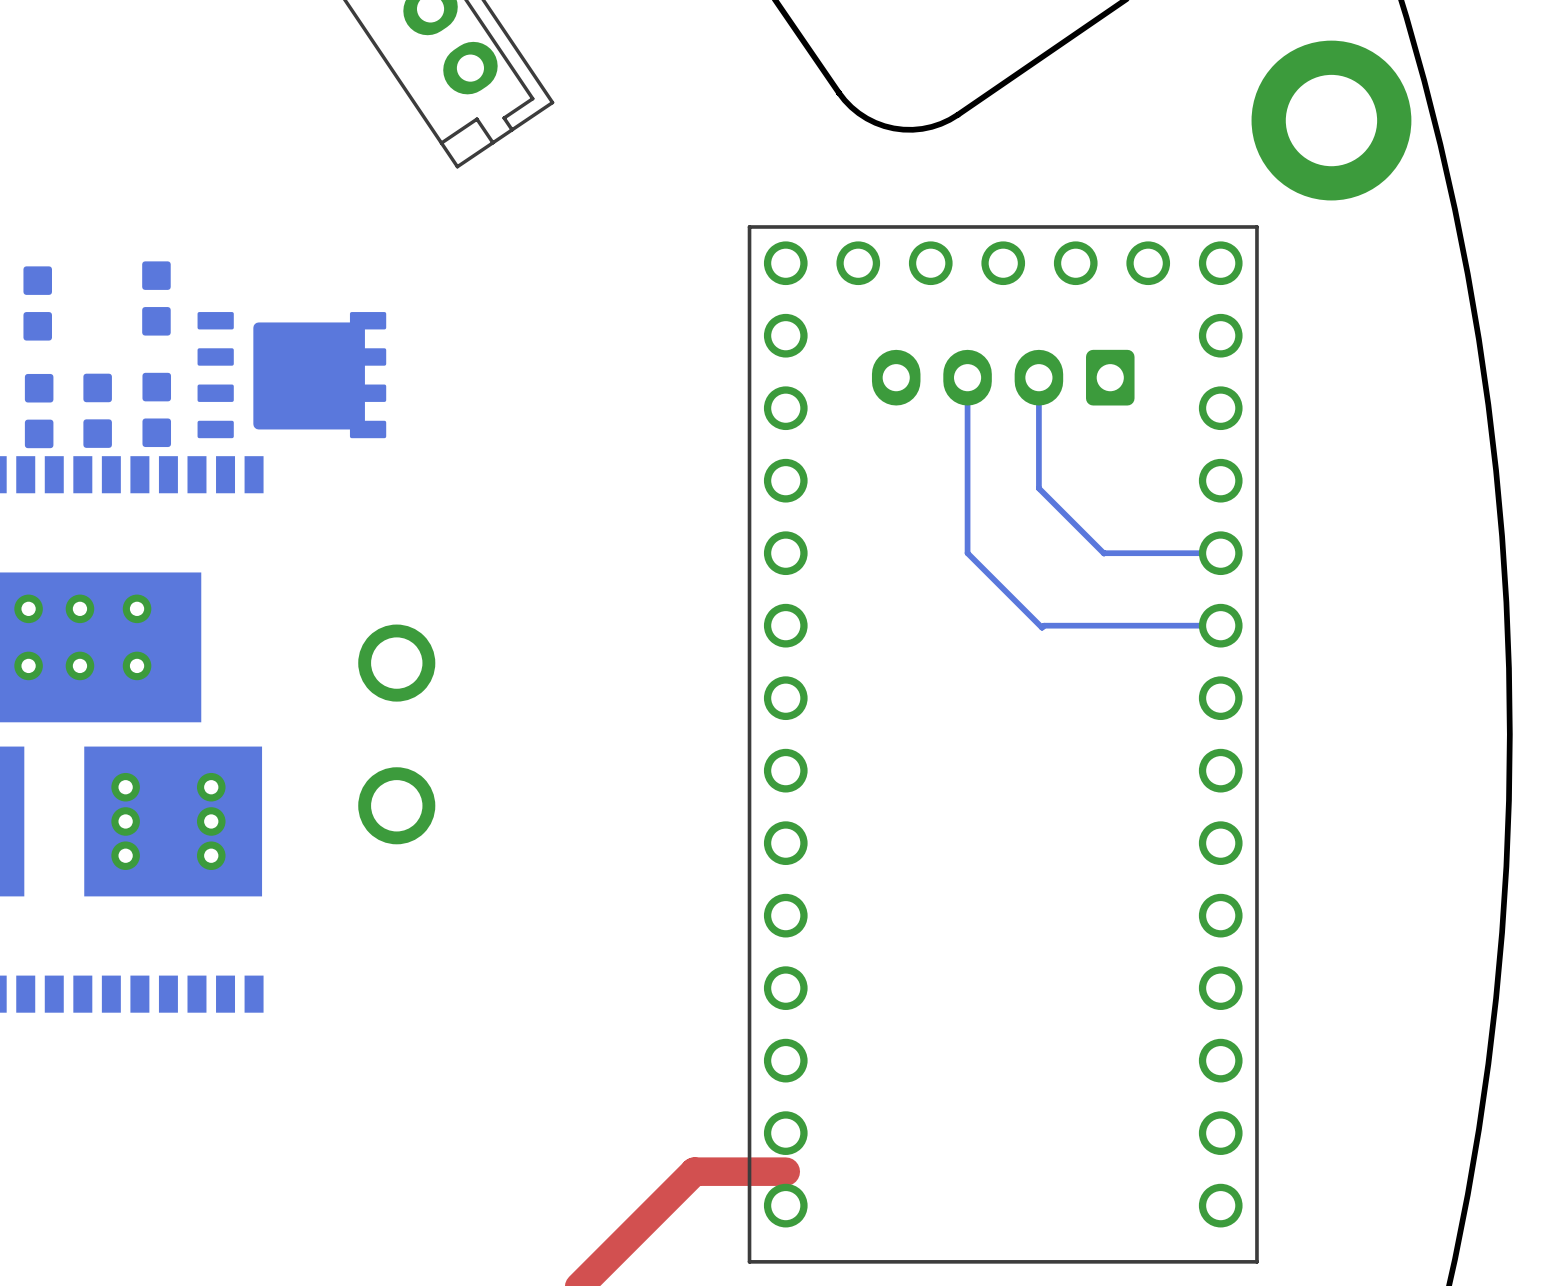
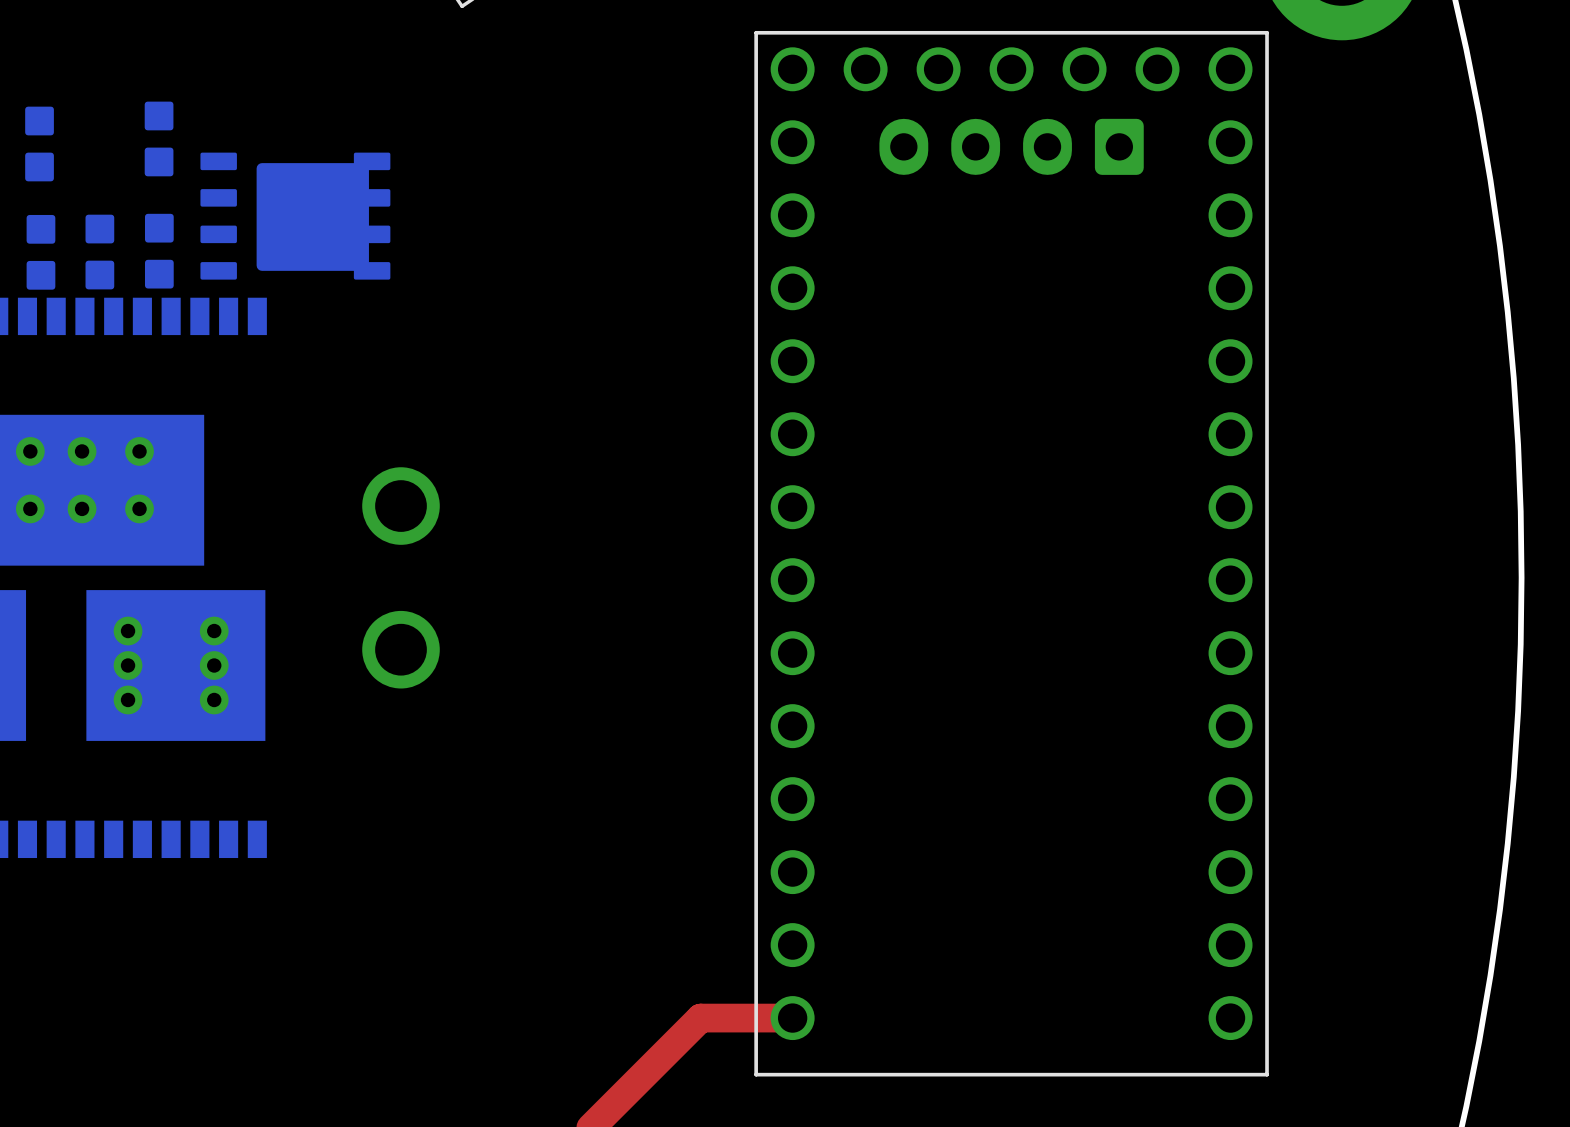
bottom track: (967, 377) (967, 553) (1042, 627) (1044, 625) (1220, 625) -> none
part position: (1003, 377) -> (1011, 146)
bottom track: (1038, 377) (1038, 488) (1103, 553) -> none
bottom track: (1104, 553) (1220, 553) -> none
part position: (1003, 744) -> (1011, 553)

